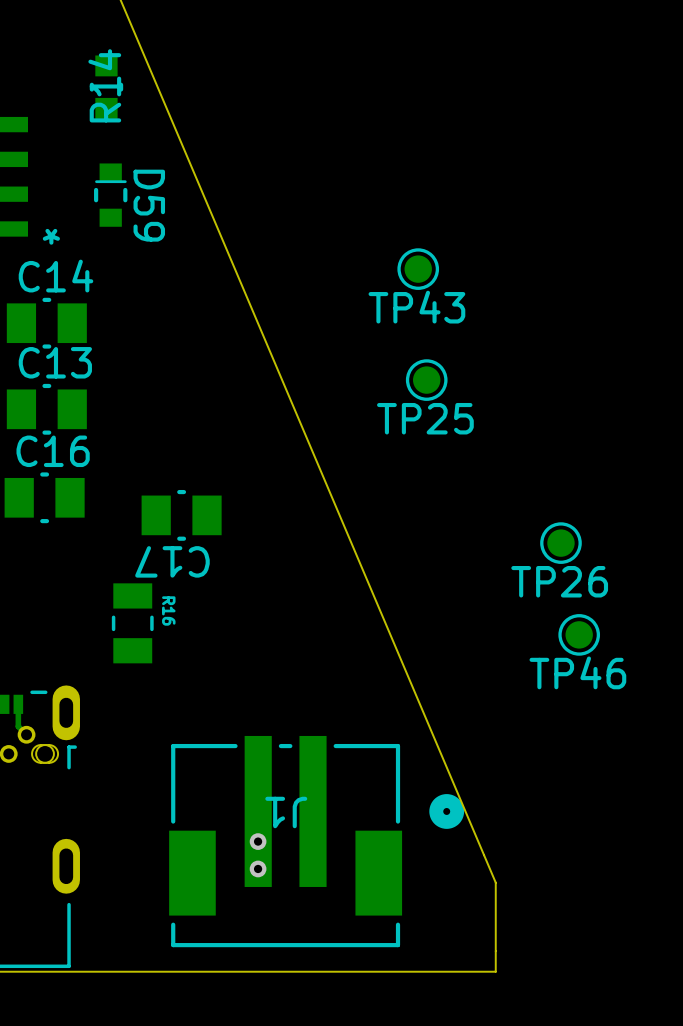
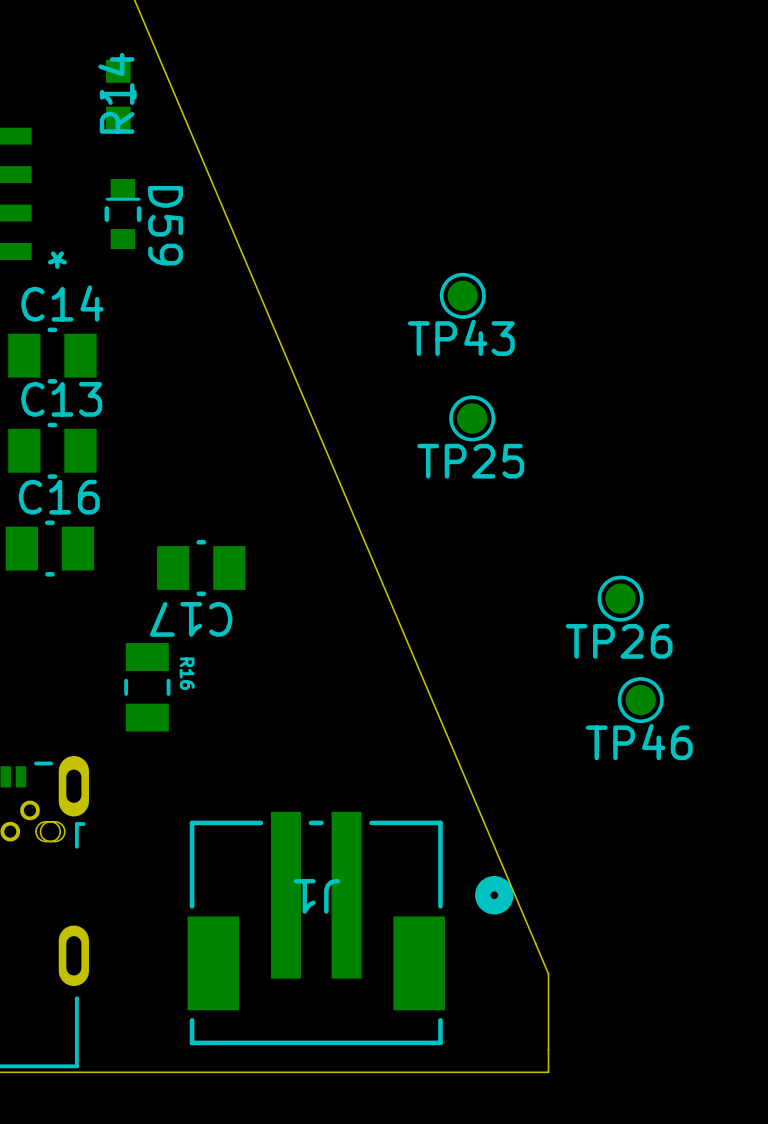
track: (18, 704) (18, 726) (26, 734) -> none
via: (258, 841) -> none
via: (258, 868) -> none

